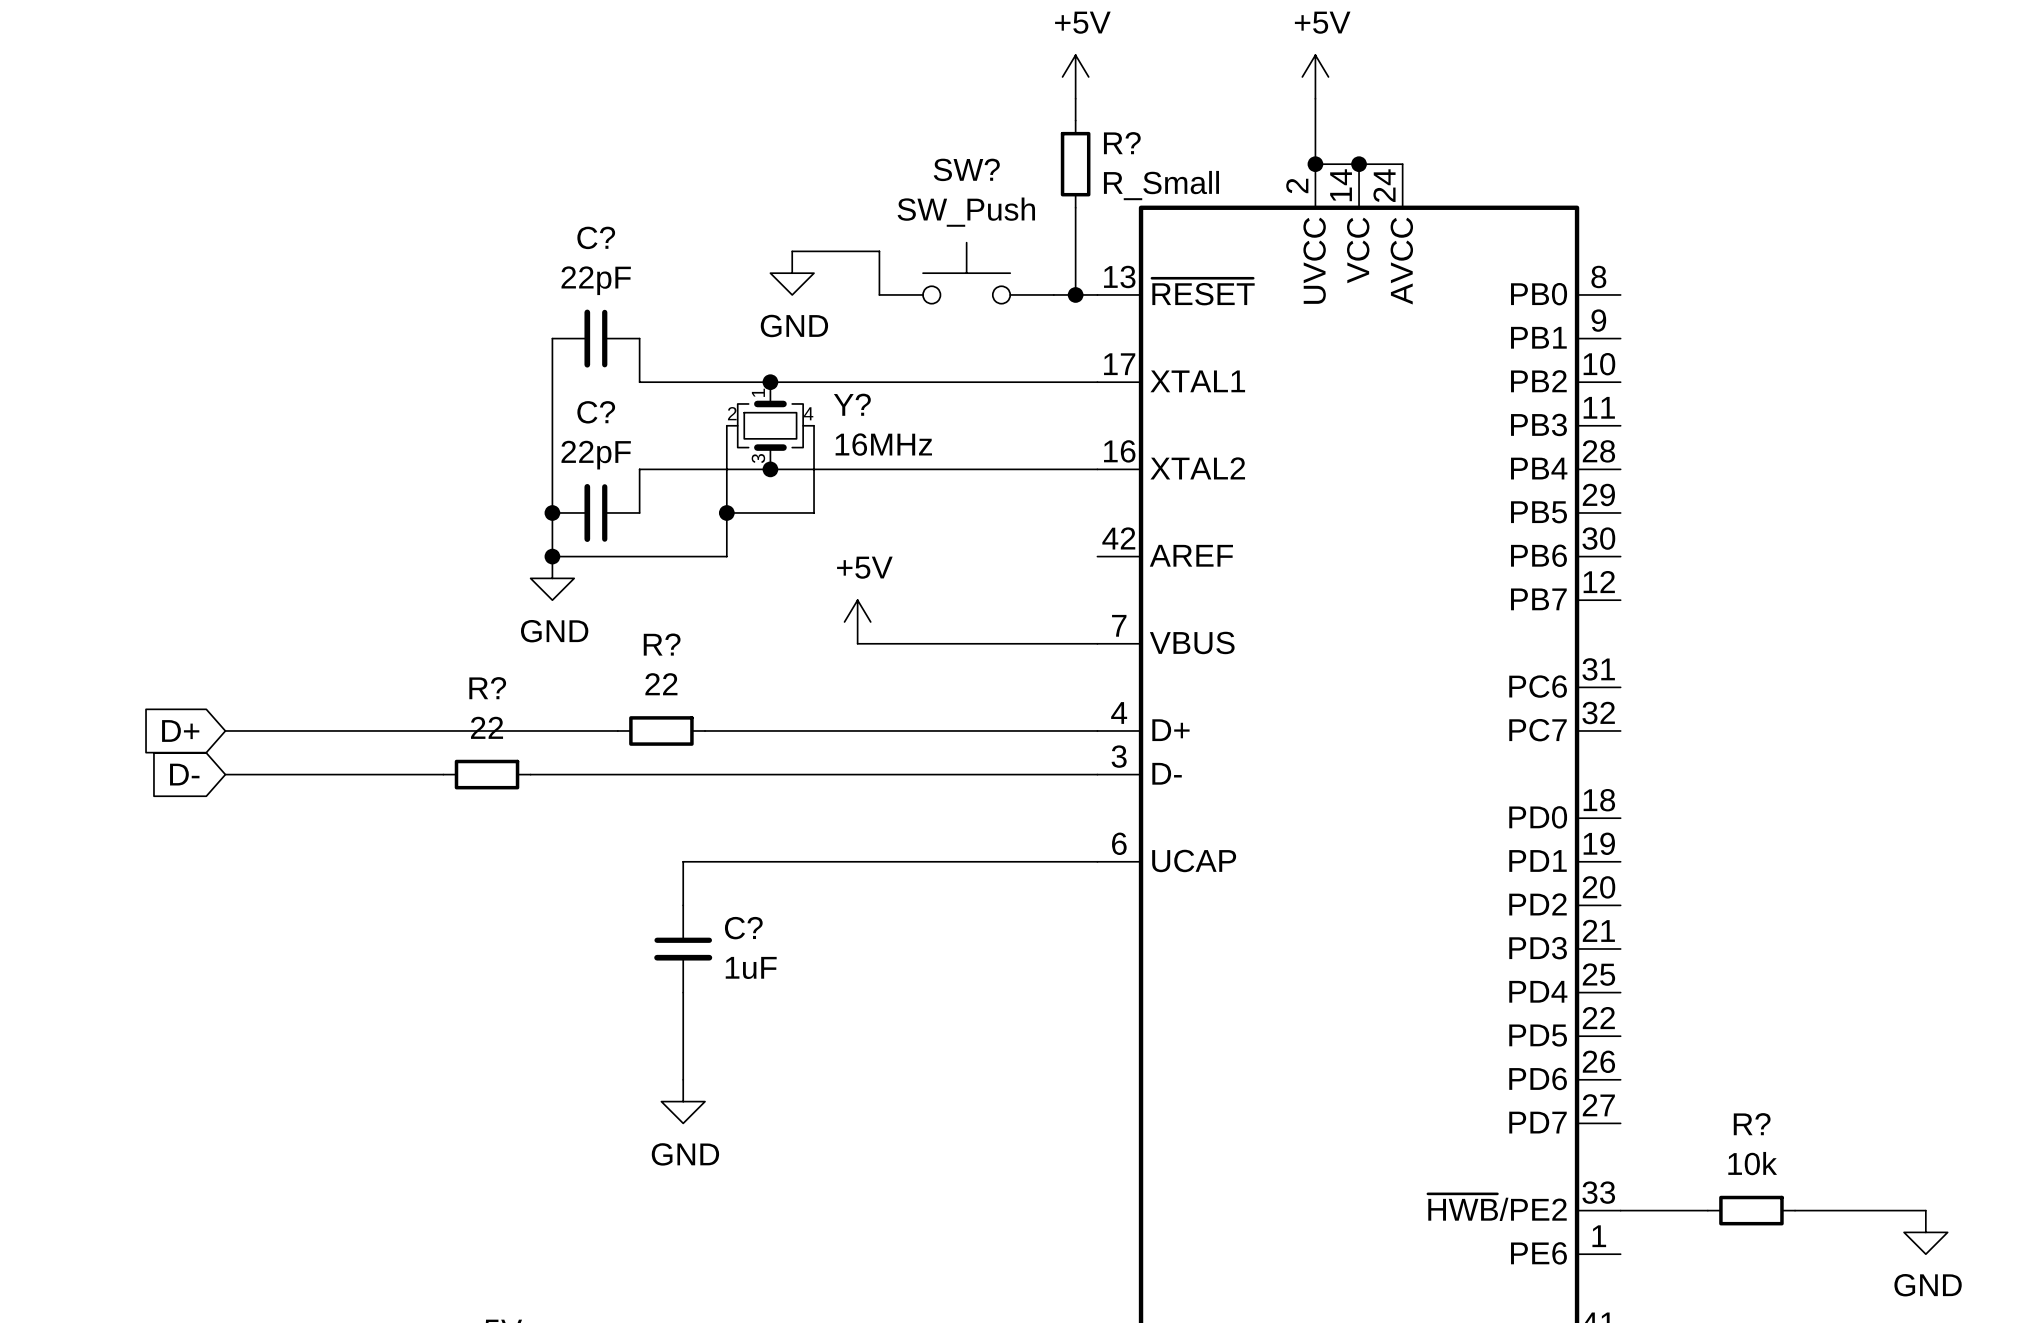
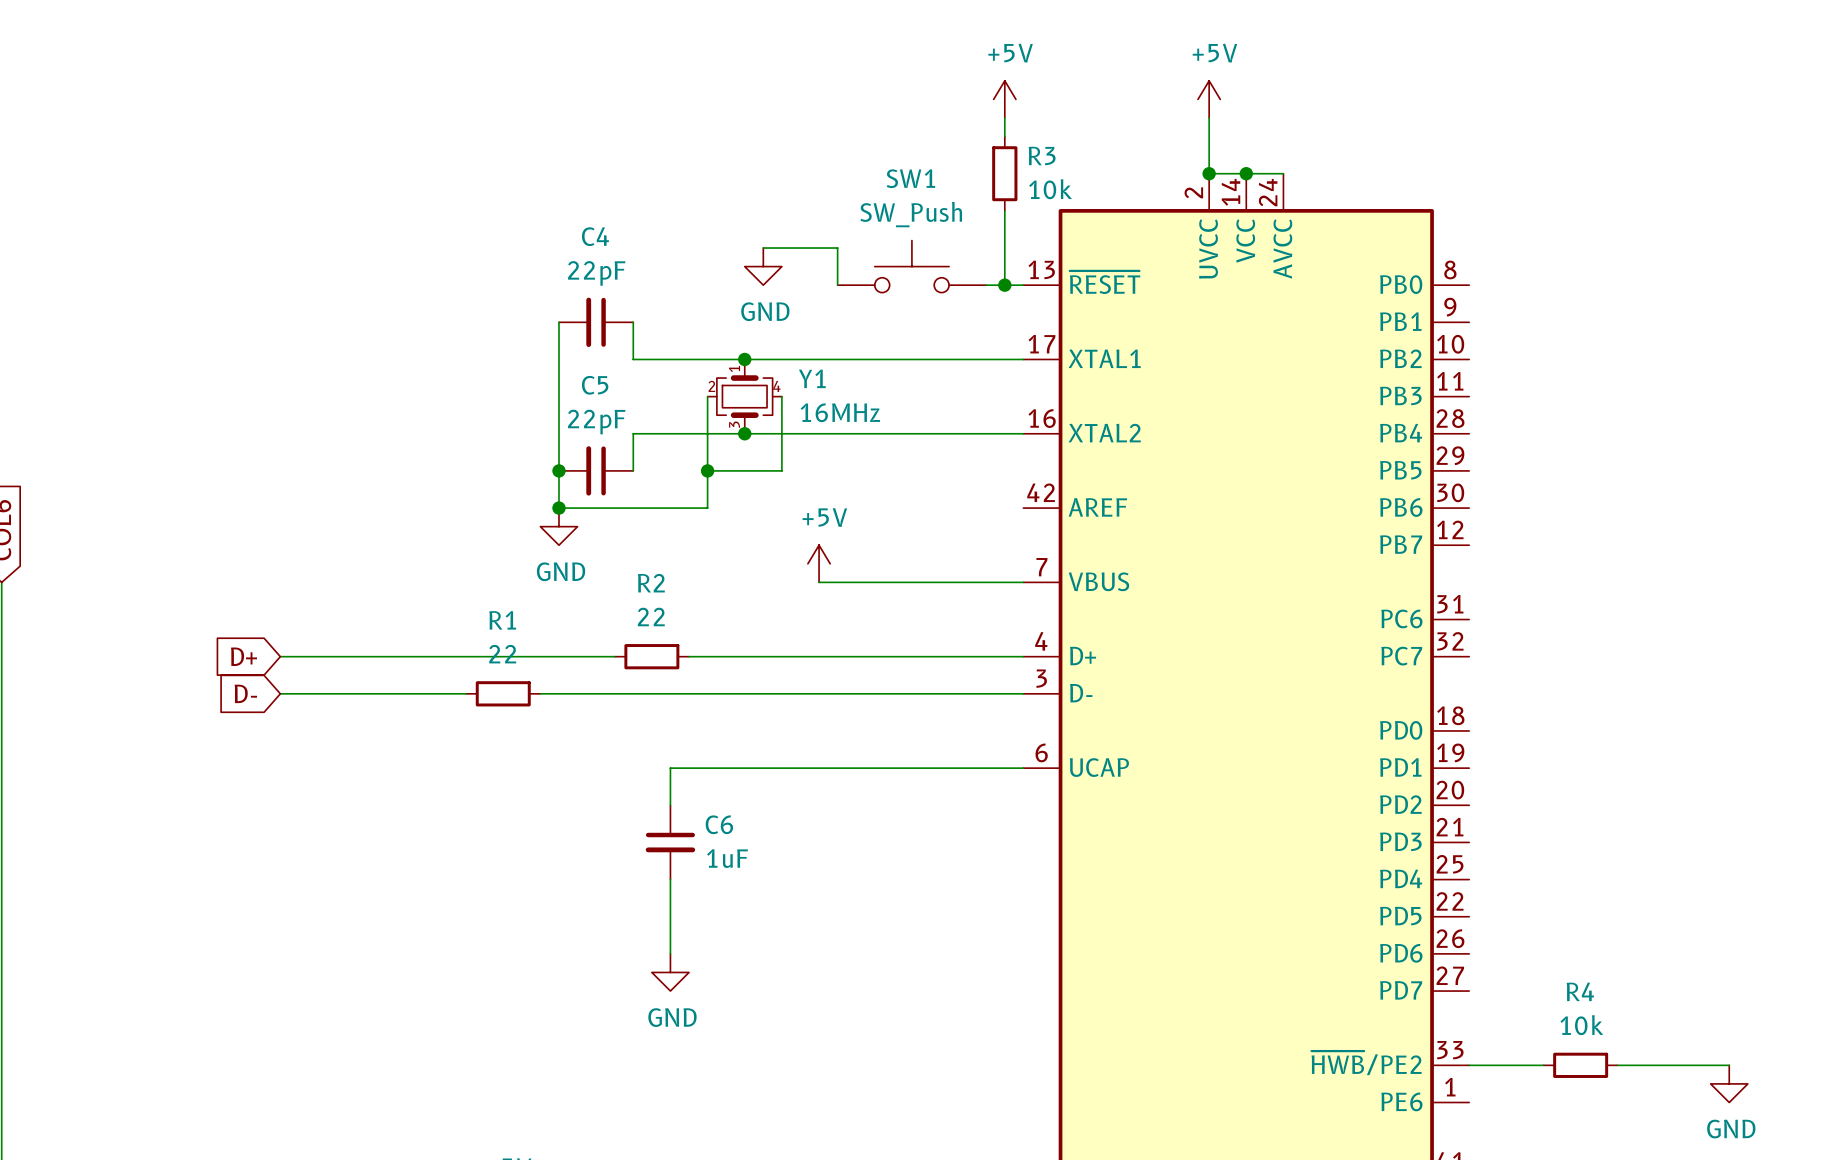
R? name: R? (1122, 143) -> R3 (1042, 155)
SW? name: SW? (966, 169) -> SW1 (910, 178)
R? value: R_Small (1161, 185) -> 10k (1050, 189)
C? name: C? (596, 237) -> C4 (595, 236)
Y? name: Y? (852, 404) -> Y1 (812, 378)
C? name: C? (596, 412) -> C5 (595, 385)
R? name: R? (662, 644) -> R2 (651, 583)
R? name: R? (487, 688) -> R1 (502, 620)
C? name: C? (743, 928) -> C6 (719, 824)
R? name: R? (1752, 1124) -> R4 (1580, 991)

